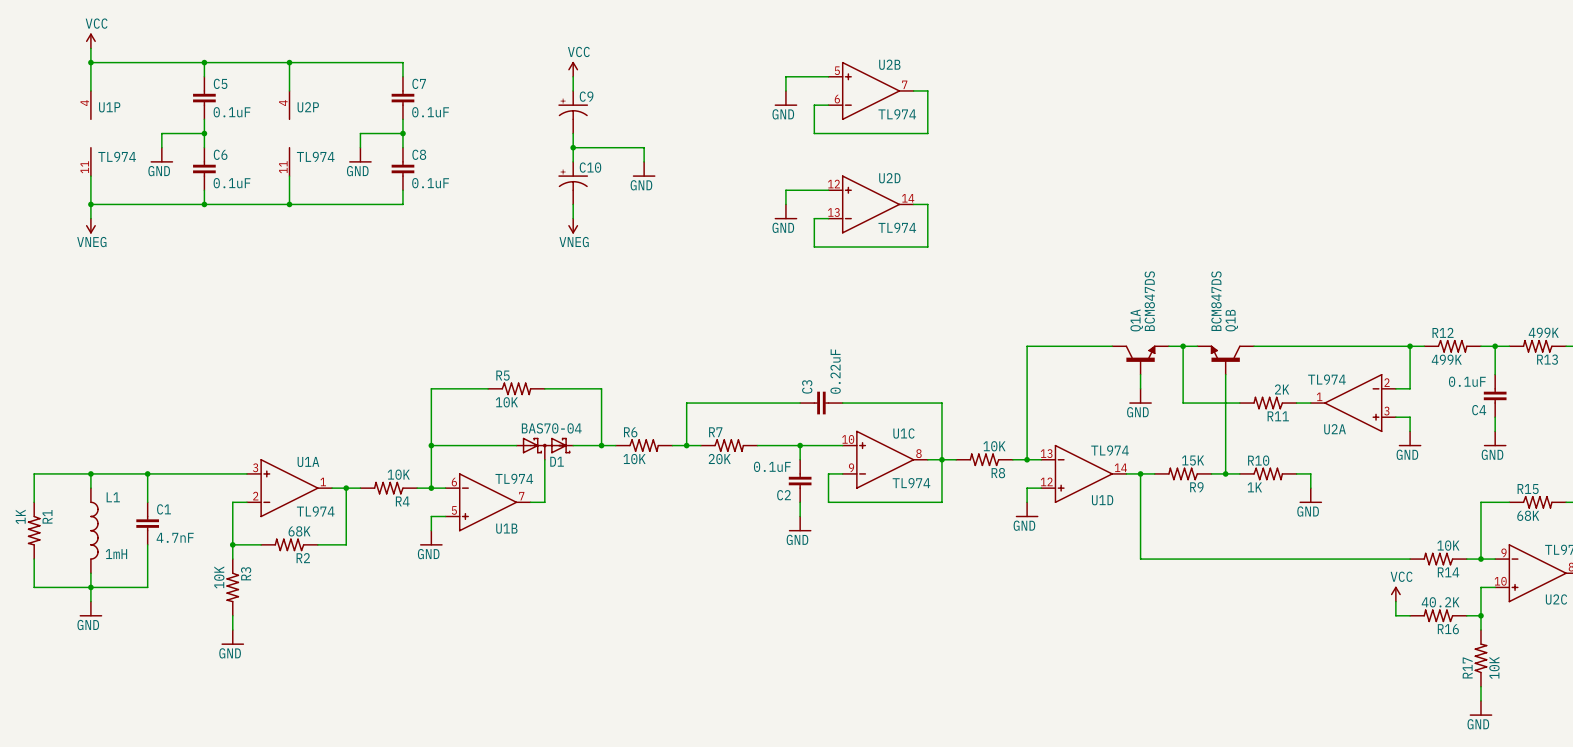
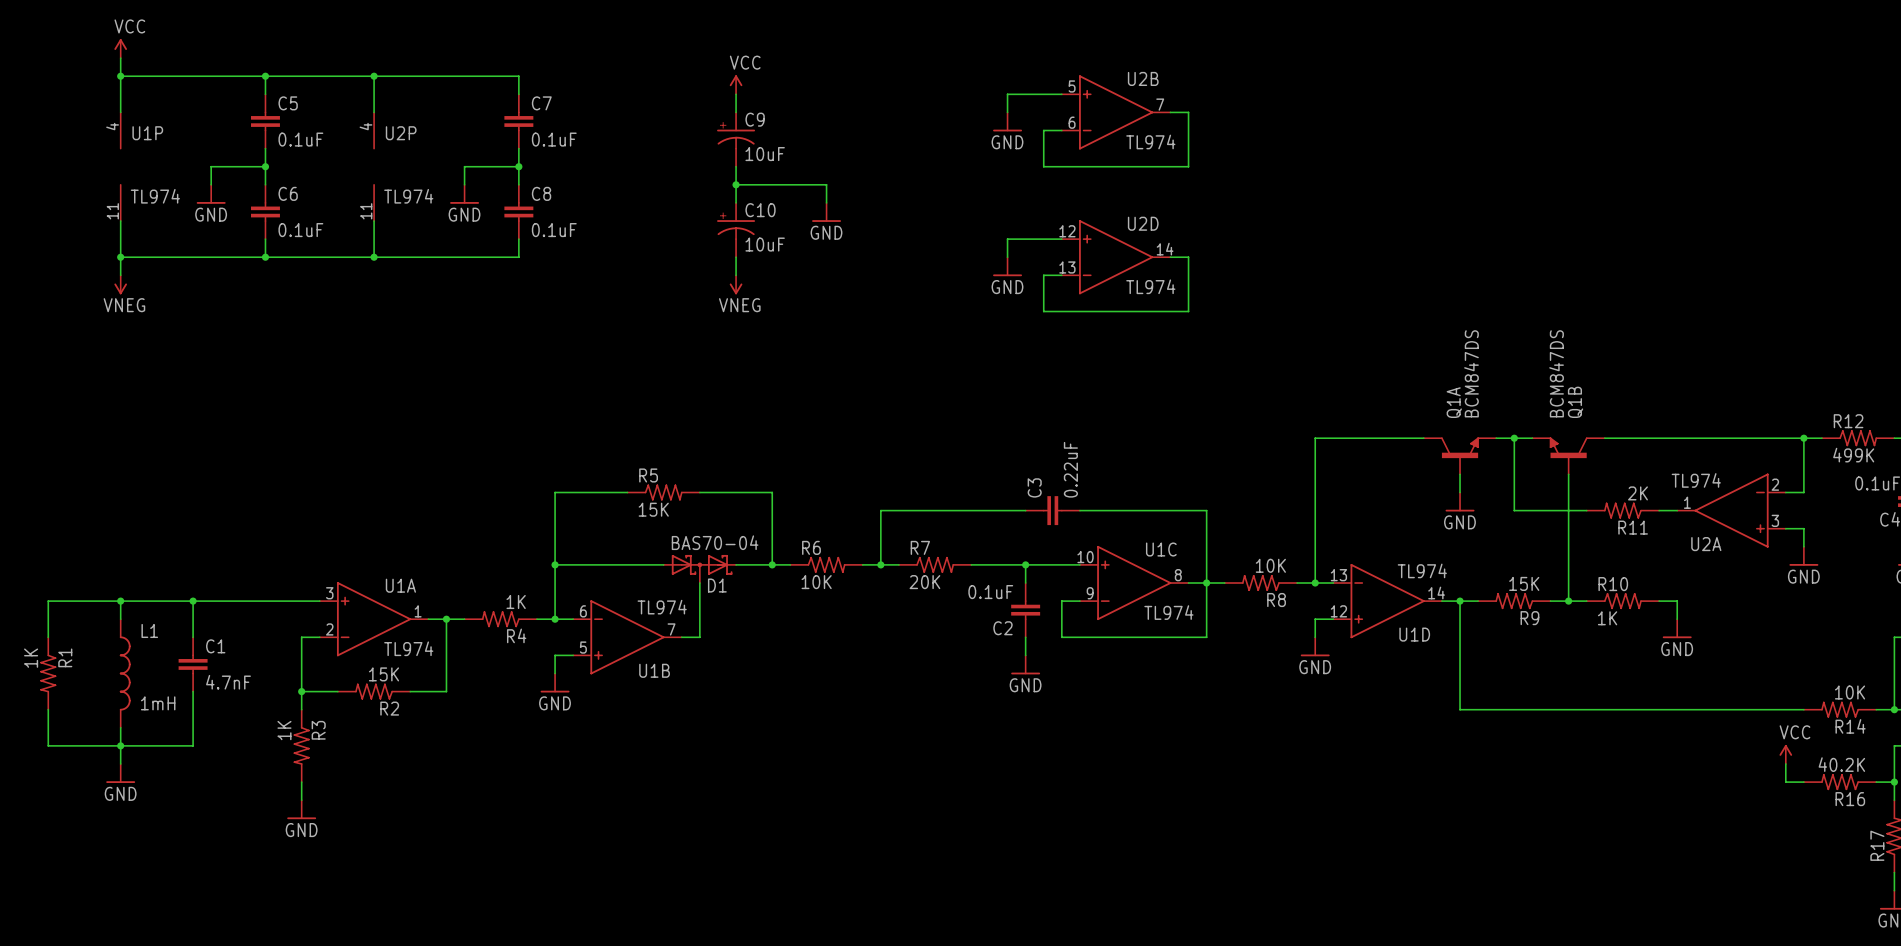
C9 value: none -> 10uF (765, 154)
C10 value: none -> 10uF (765, 244)
R5 value: 10K (506, 402) -> 15K (653, 509)
R4 value: 10K (398, 474) -> 1K (516, 602)
R2 value: 68K (299, 531) -> 15K (383, 674)
R3 value: 10K (219, 577) -> 1K (284, 730)

